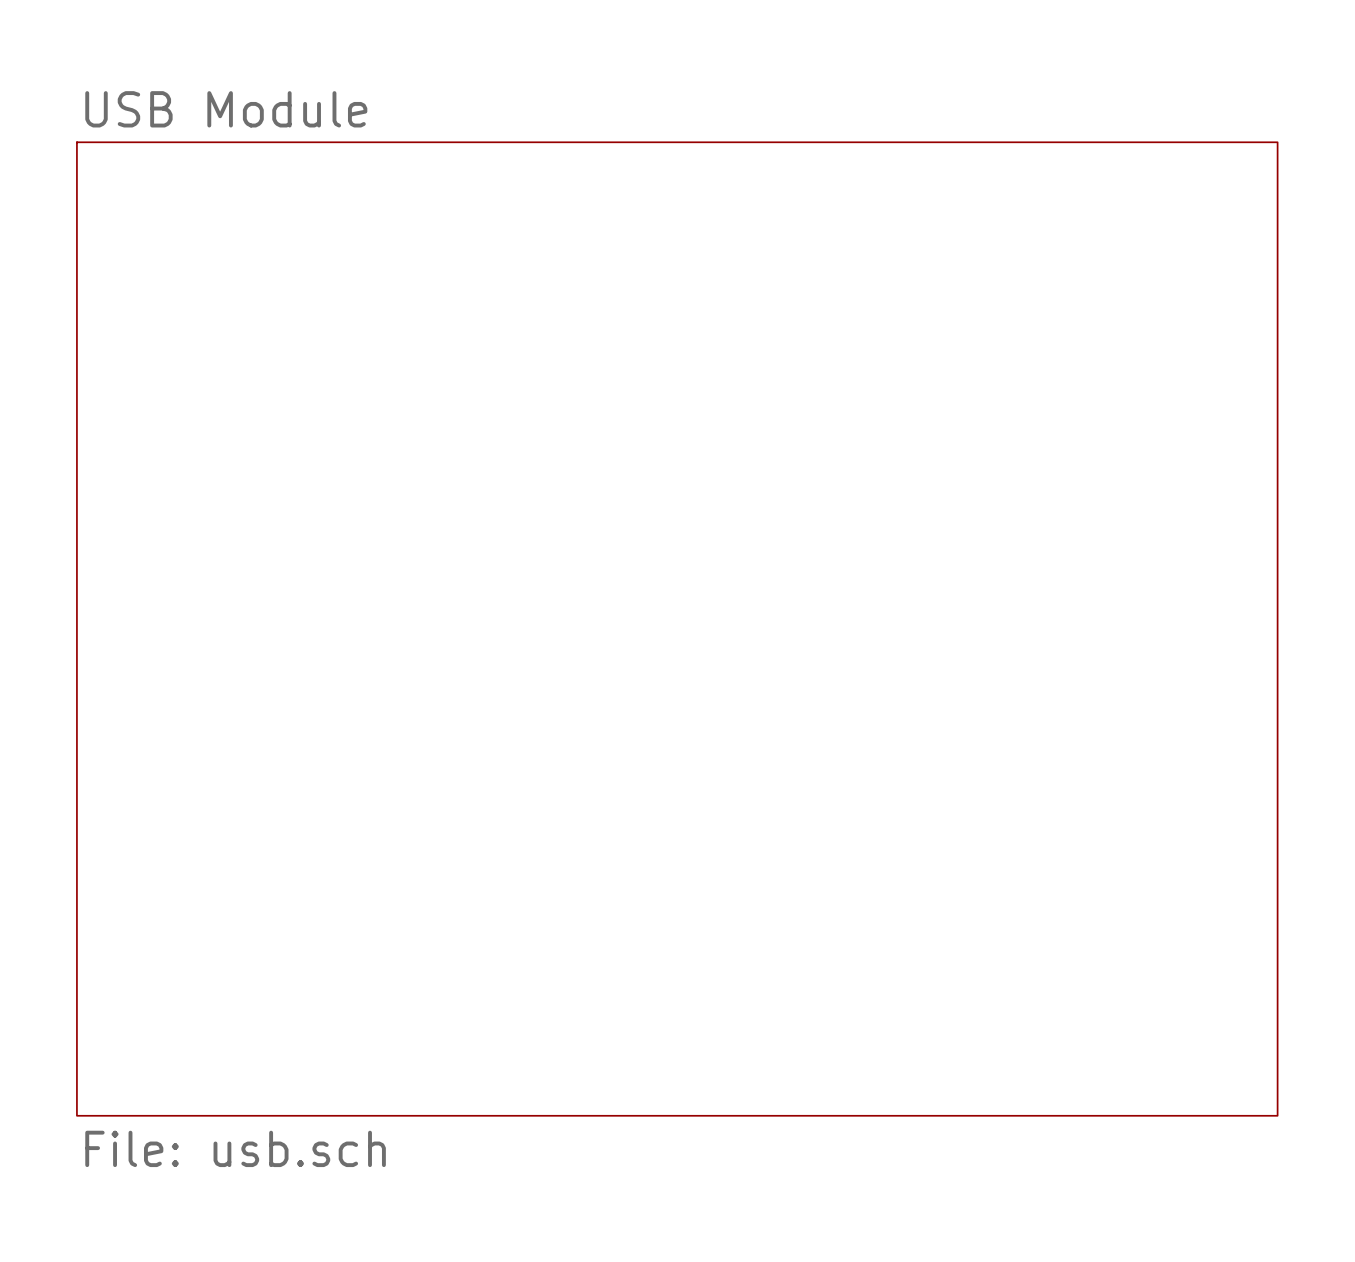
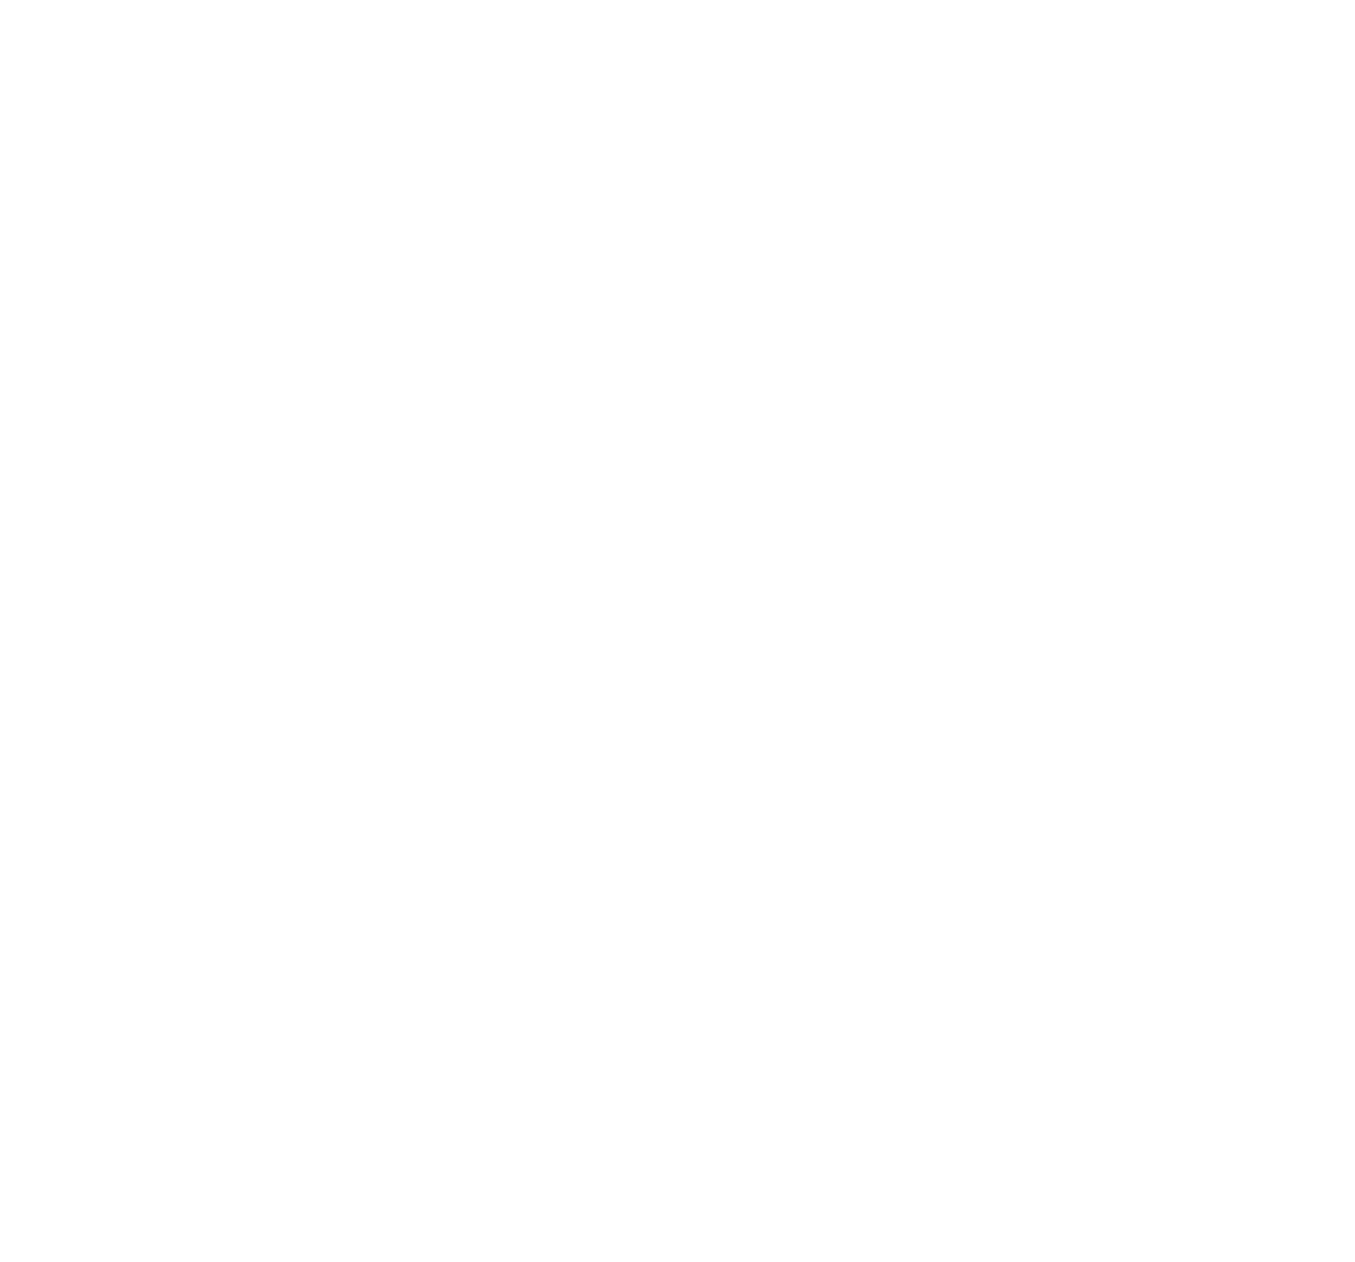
sheet USB Module: File: usb.sch (677, 629) -> none

